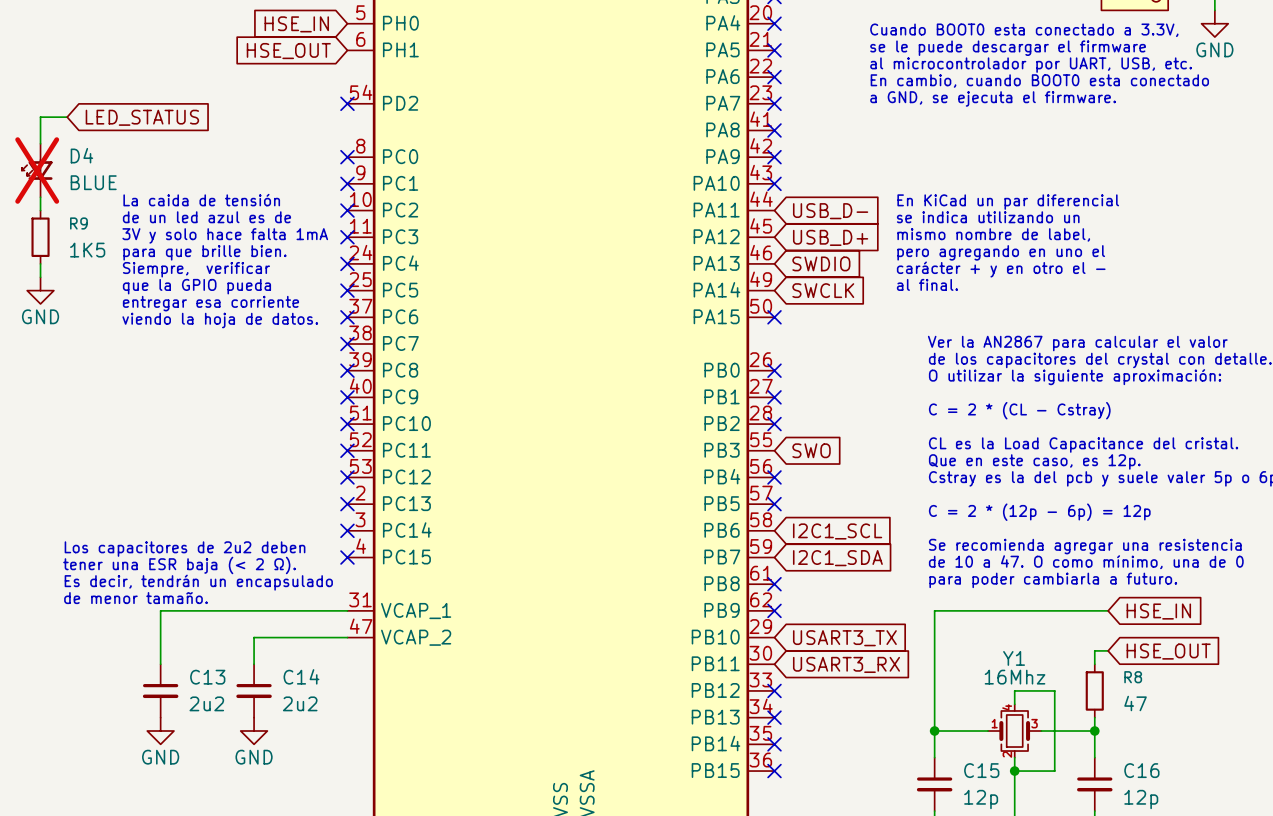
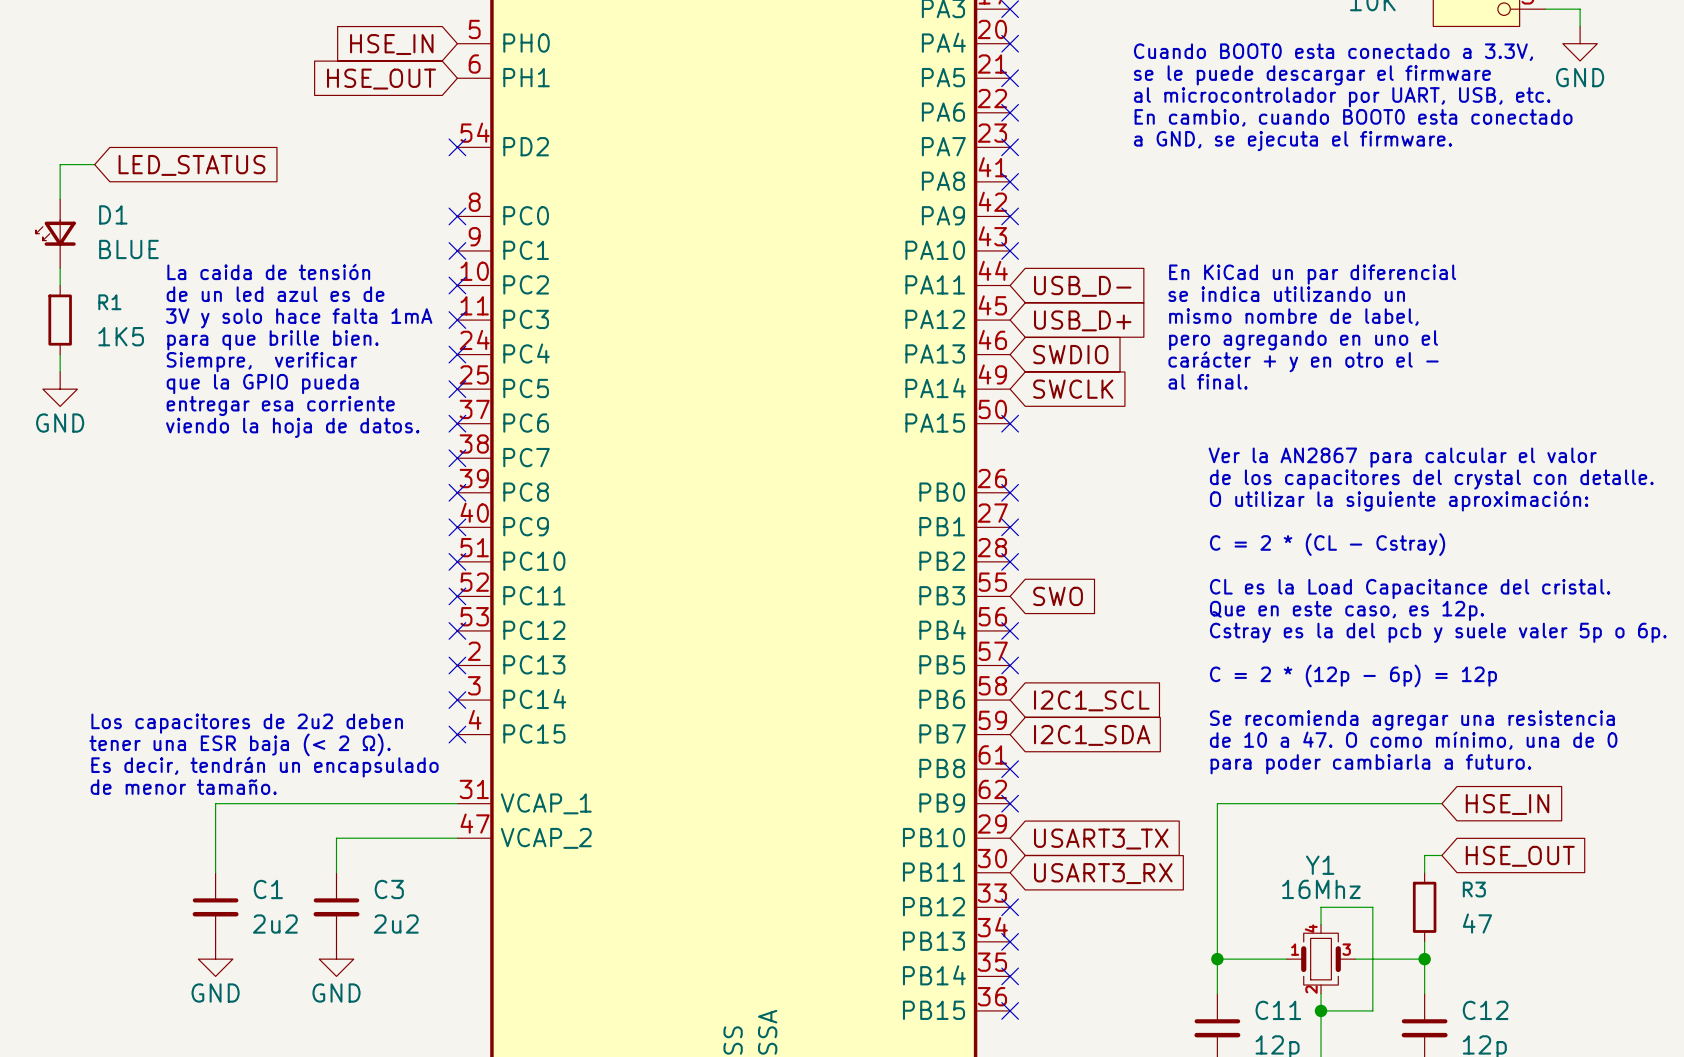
D4 name: D4 (81, 155) -> D1 (113, 214)
D4 do-not-place cross: (37, 170) -> none
R9 name: R9 (78, 223) -> R1 (109, 302)
C14 name: C14 (301, 676) -> C3 (389, 889)
C13 name: C13 (207, 677) -> C1 (268, 889)
R8 name: R8 (1133, 677) -> R3 (1474, 889)
C15 name: C15 (981, 770) -> C11 (1278, 1010)
C16 name: C16 (1141, 770) -> C12 (1485, 1010)

